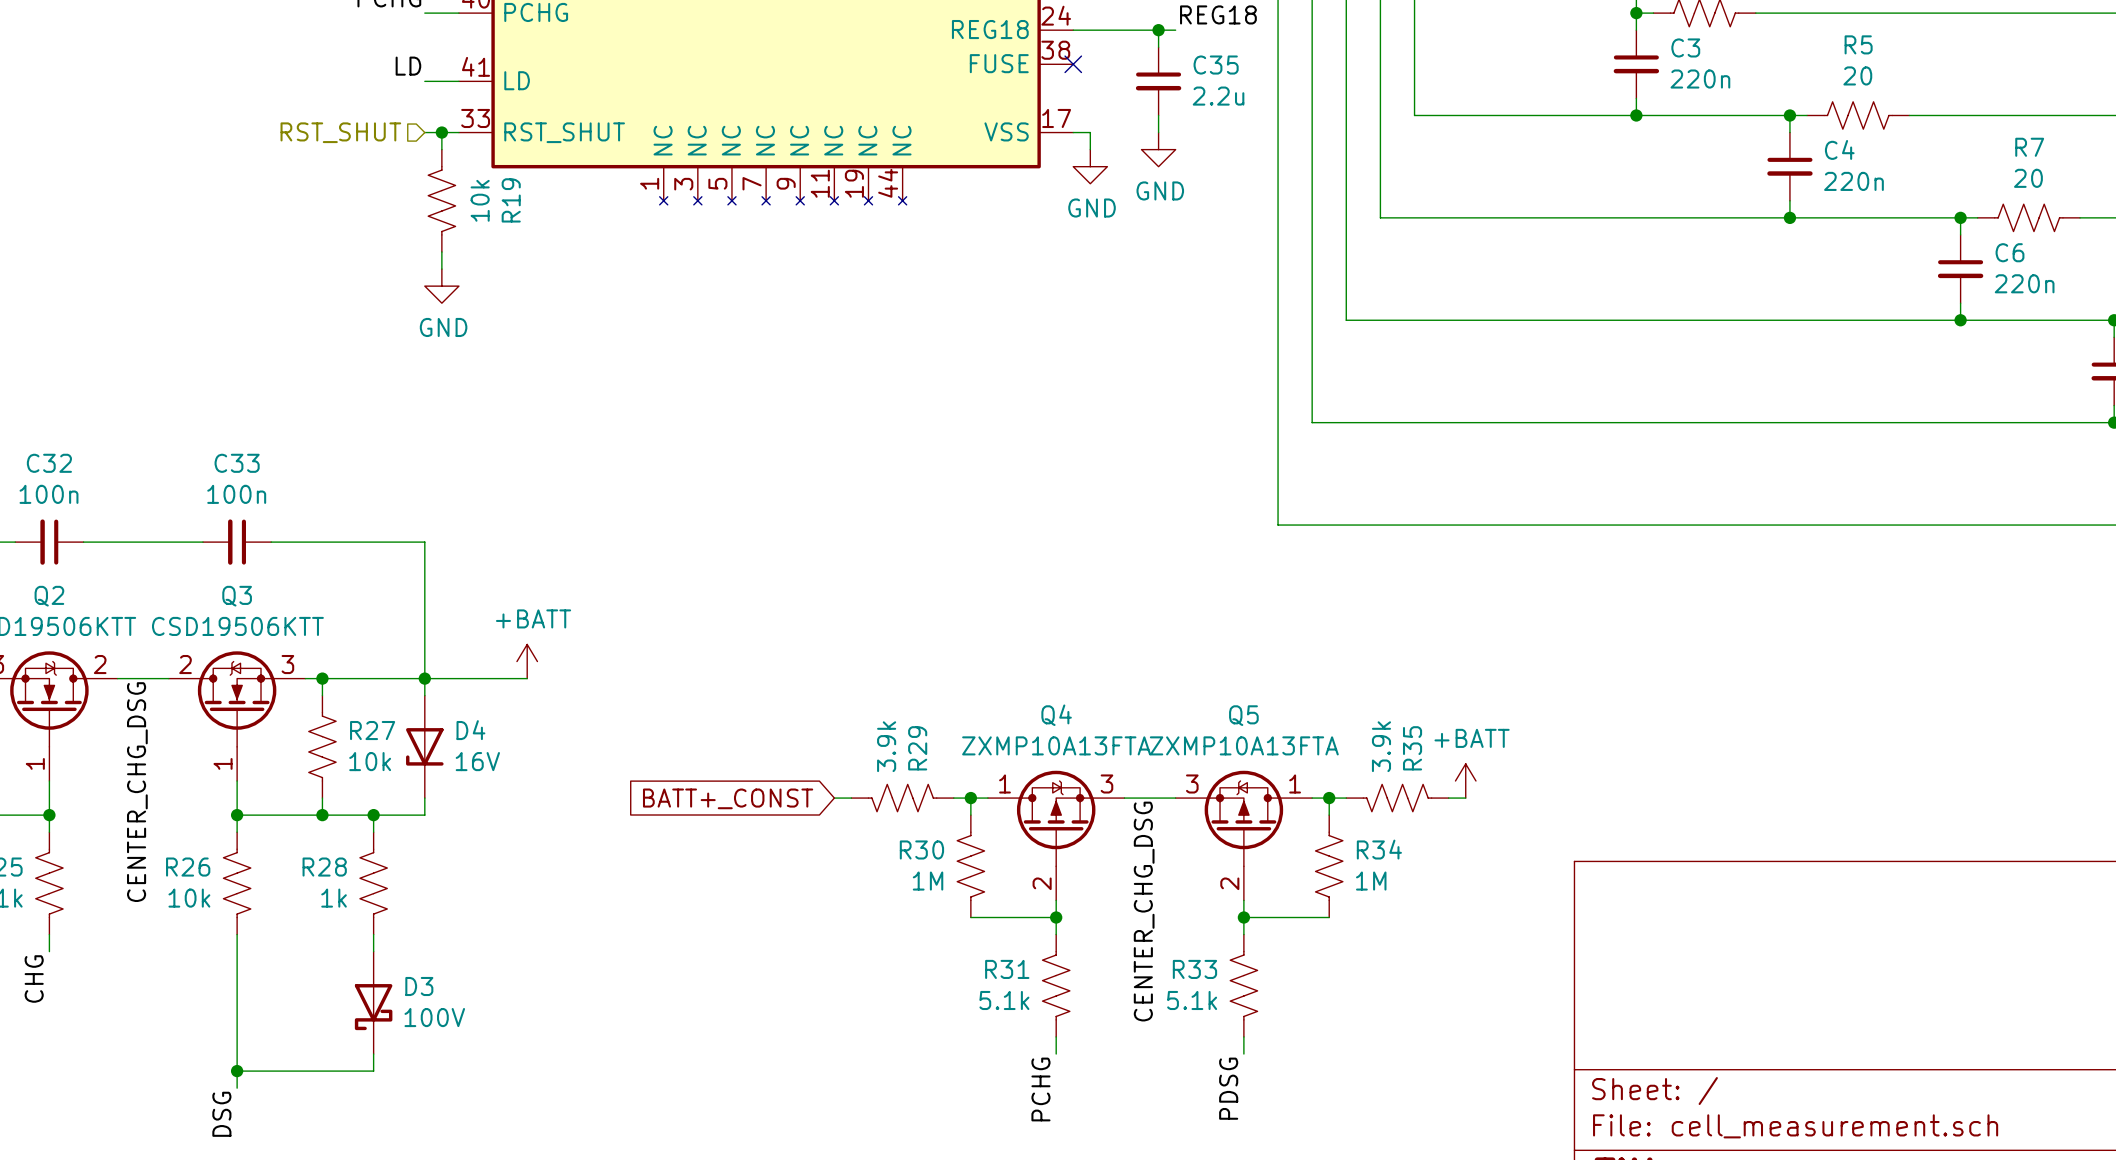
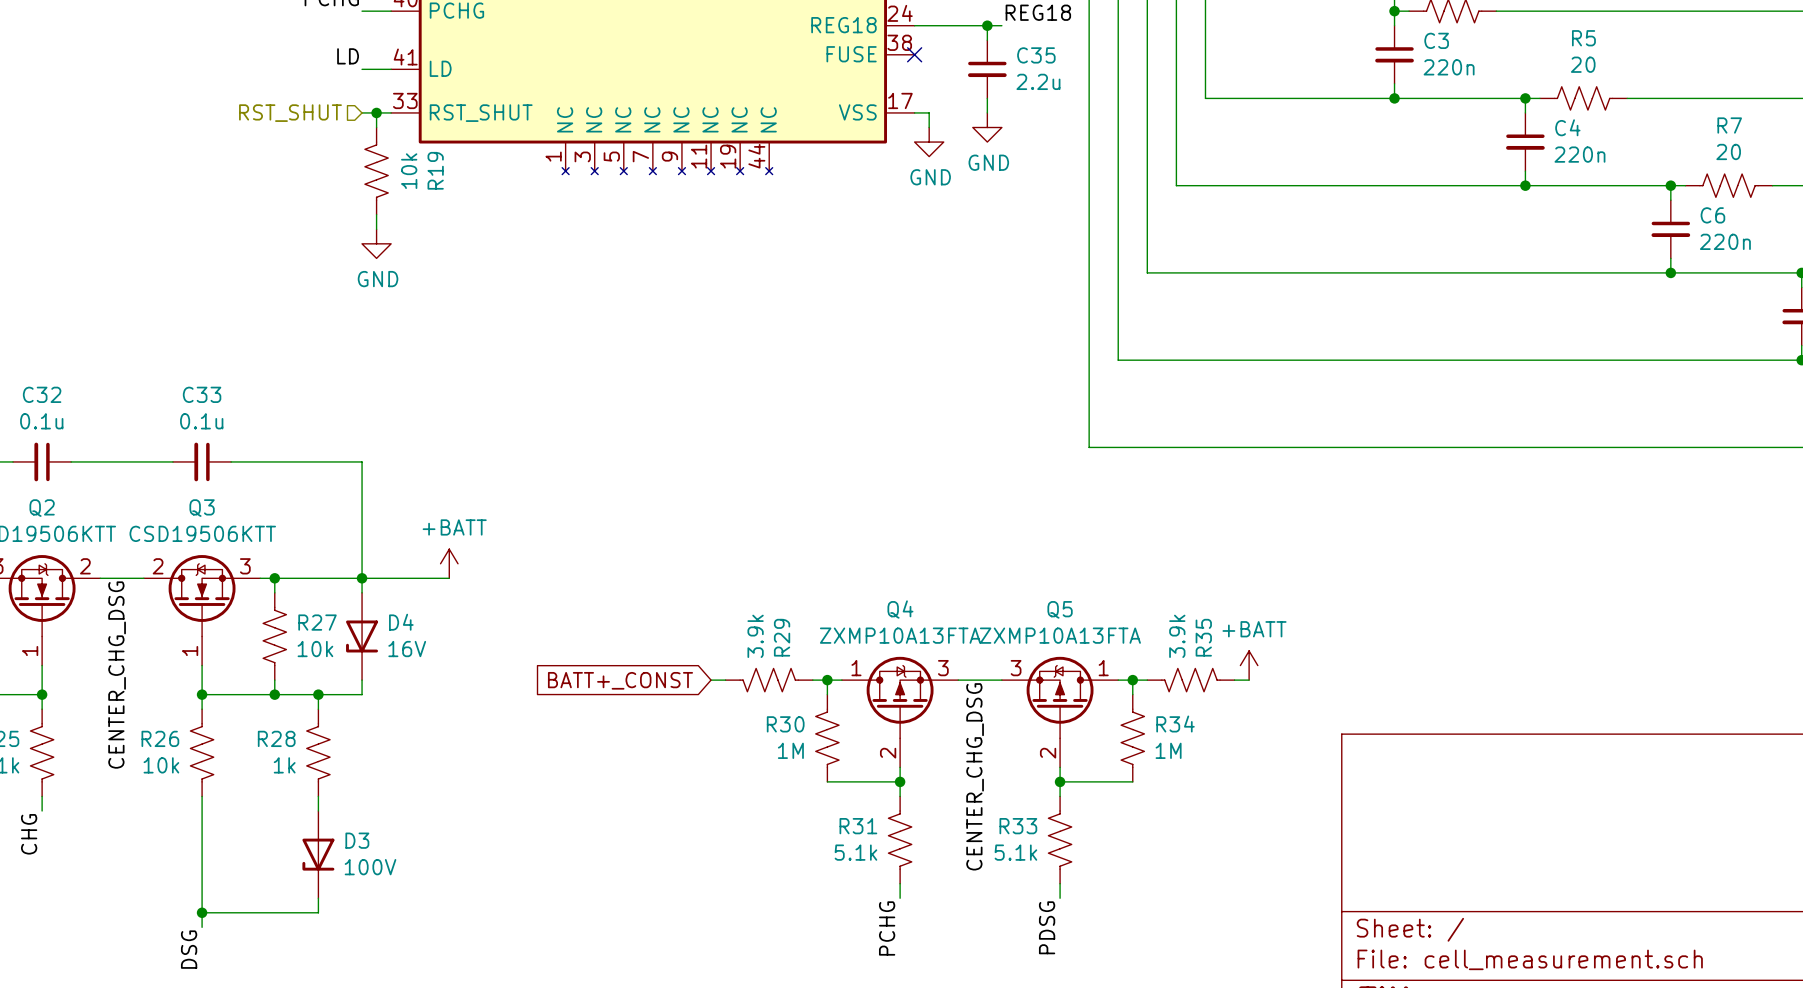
C32 value: 100n (49, 494) -> 0.1u (41, 421)
C33 value: 100n (236, 494) -> 0.1u (201, 421)
D3 symbol: [354, 951, 393, 1055] -> [302, 810, 335, 899]

